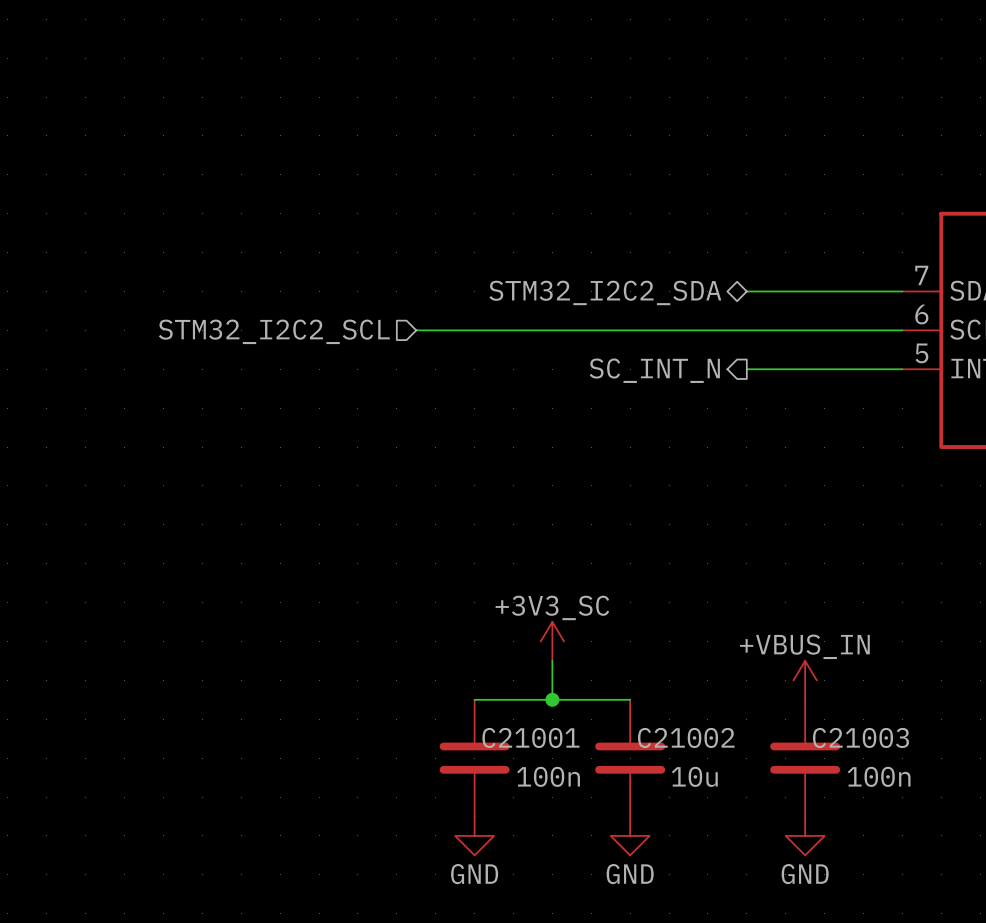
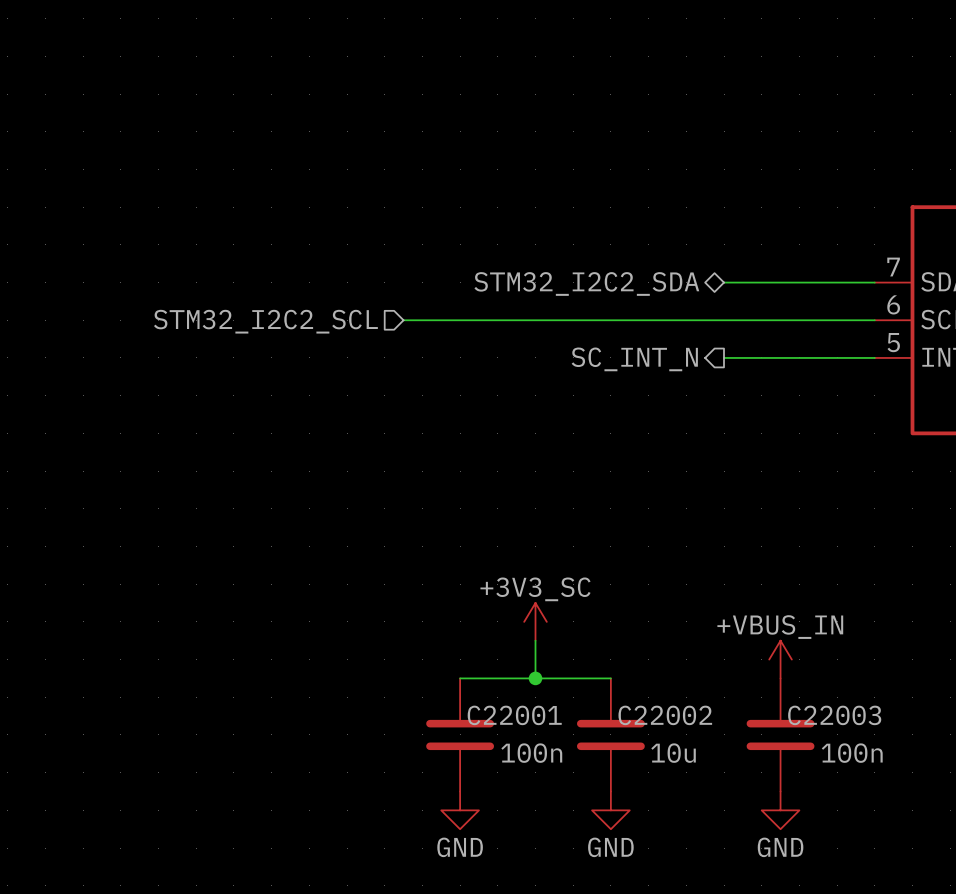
C21001 name: C21001 (530, 737) -> C22001 (514, 715)
C21002 name: C21002 (686, 737) -> C22002 (665, 715)
C21003 name: C21003 (860, 737) -> C22003 (834, 715)

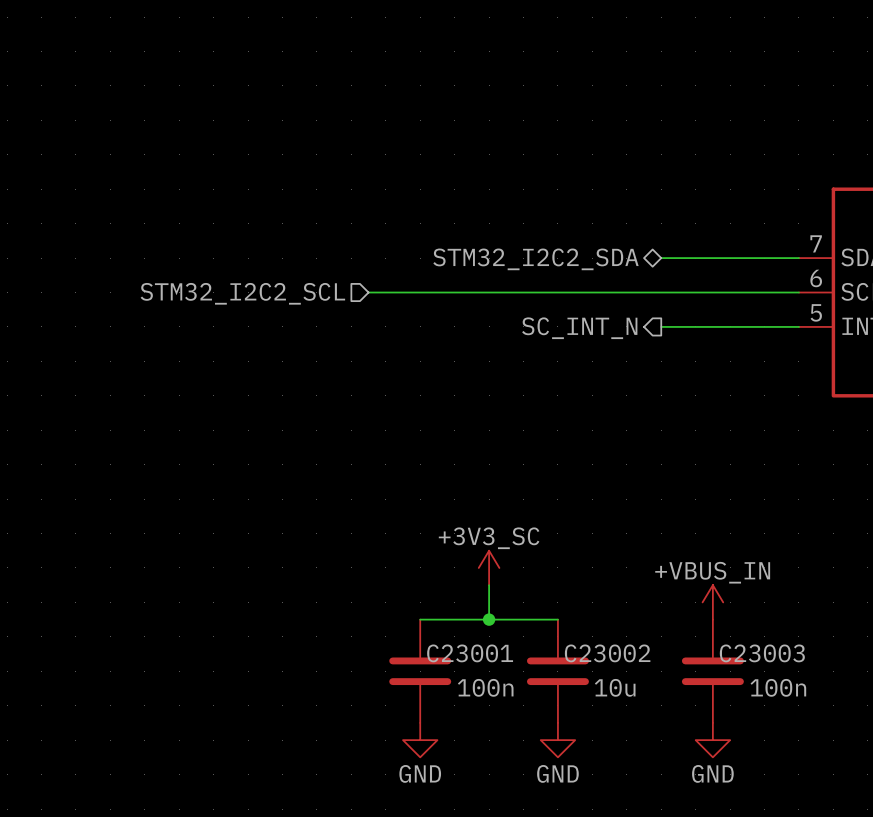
C22001 name: C22001 (514, 715) -> C23001 (470, 653)
C22002 name: C22002 (665, 715) -> C23002 (607, 653)
C22003 name: C22003 (834, 715) -> C23003 (762, 653)

